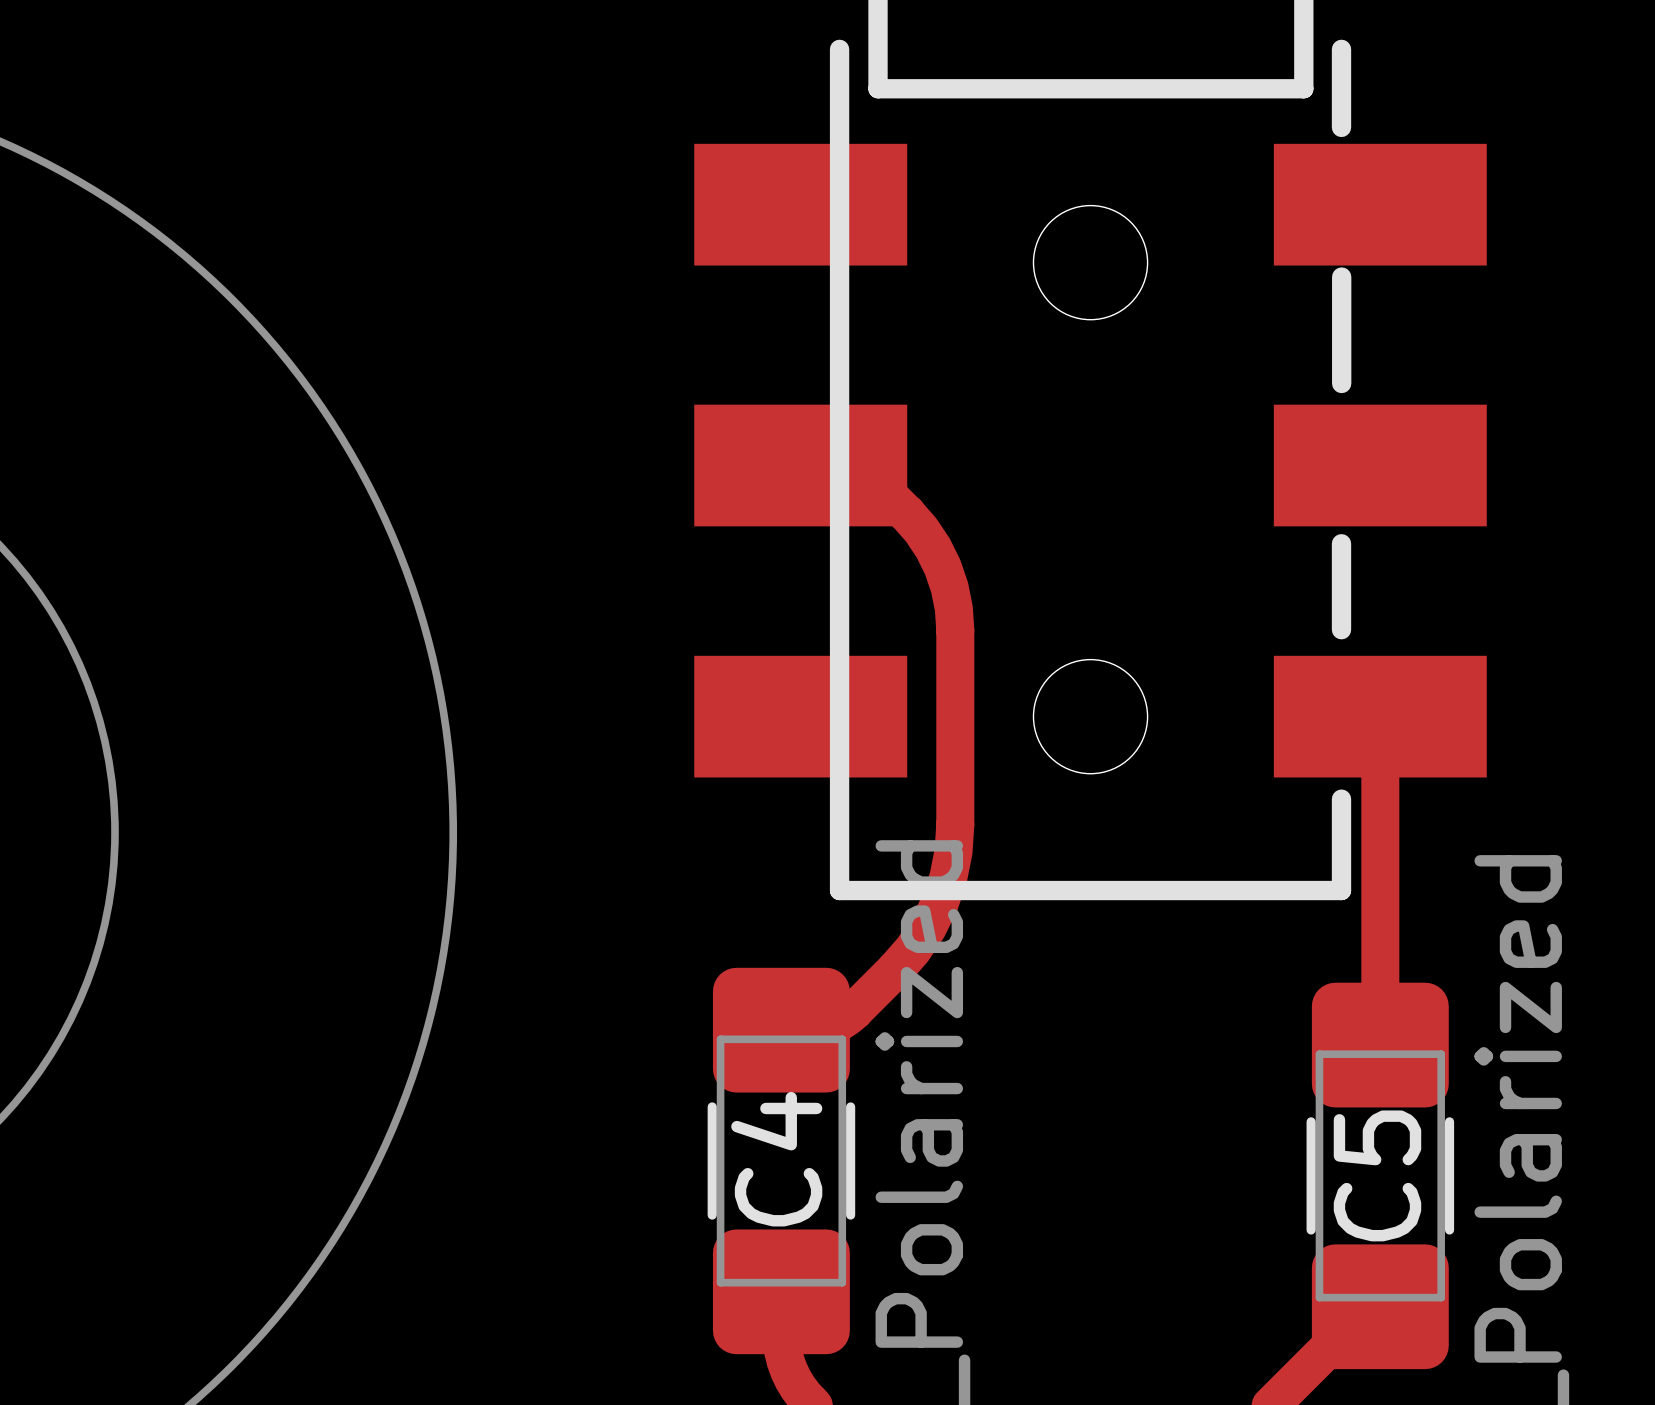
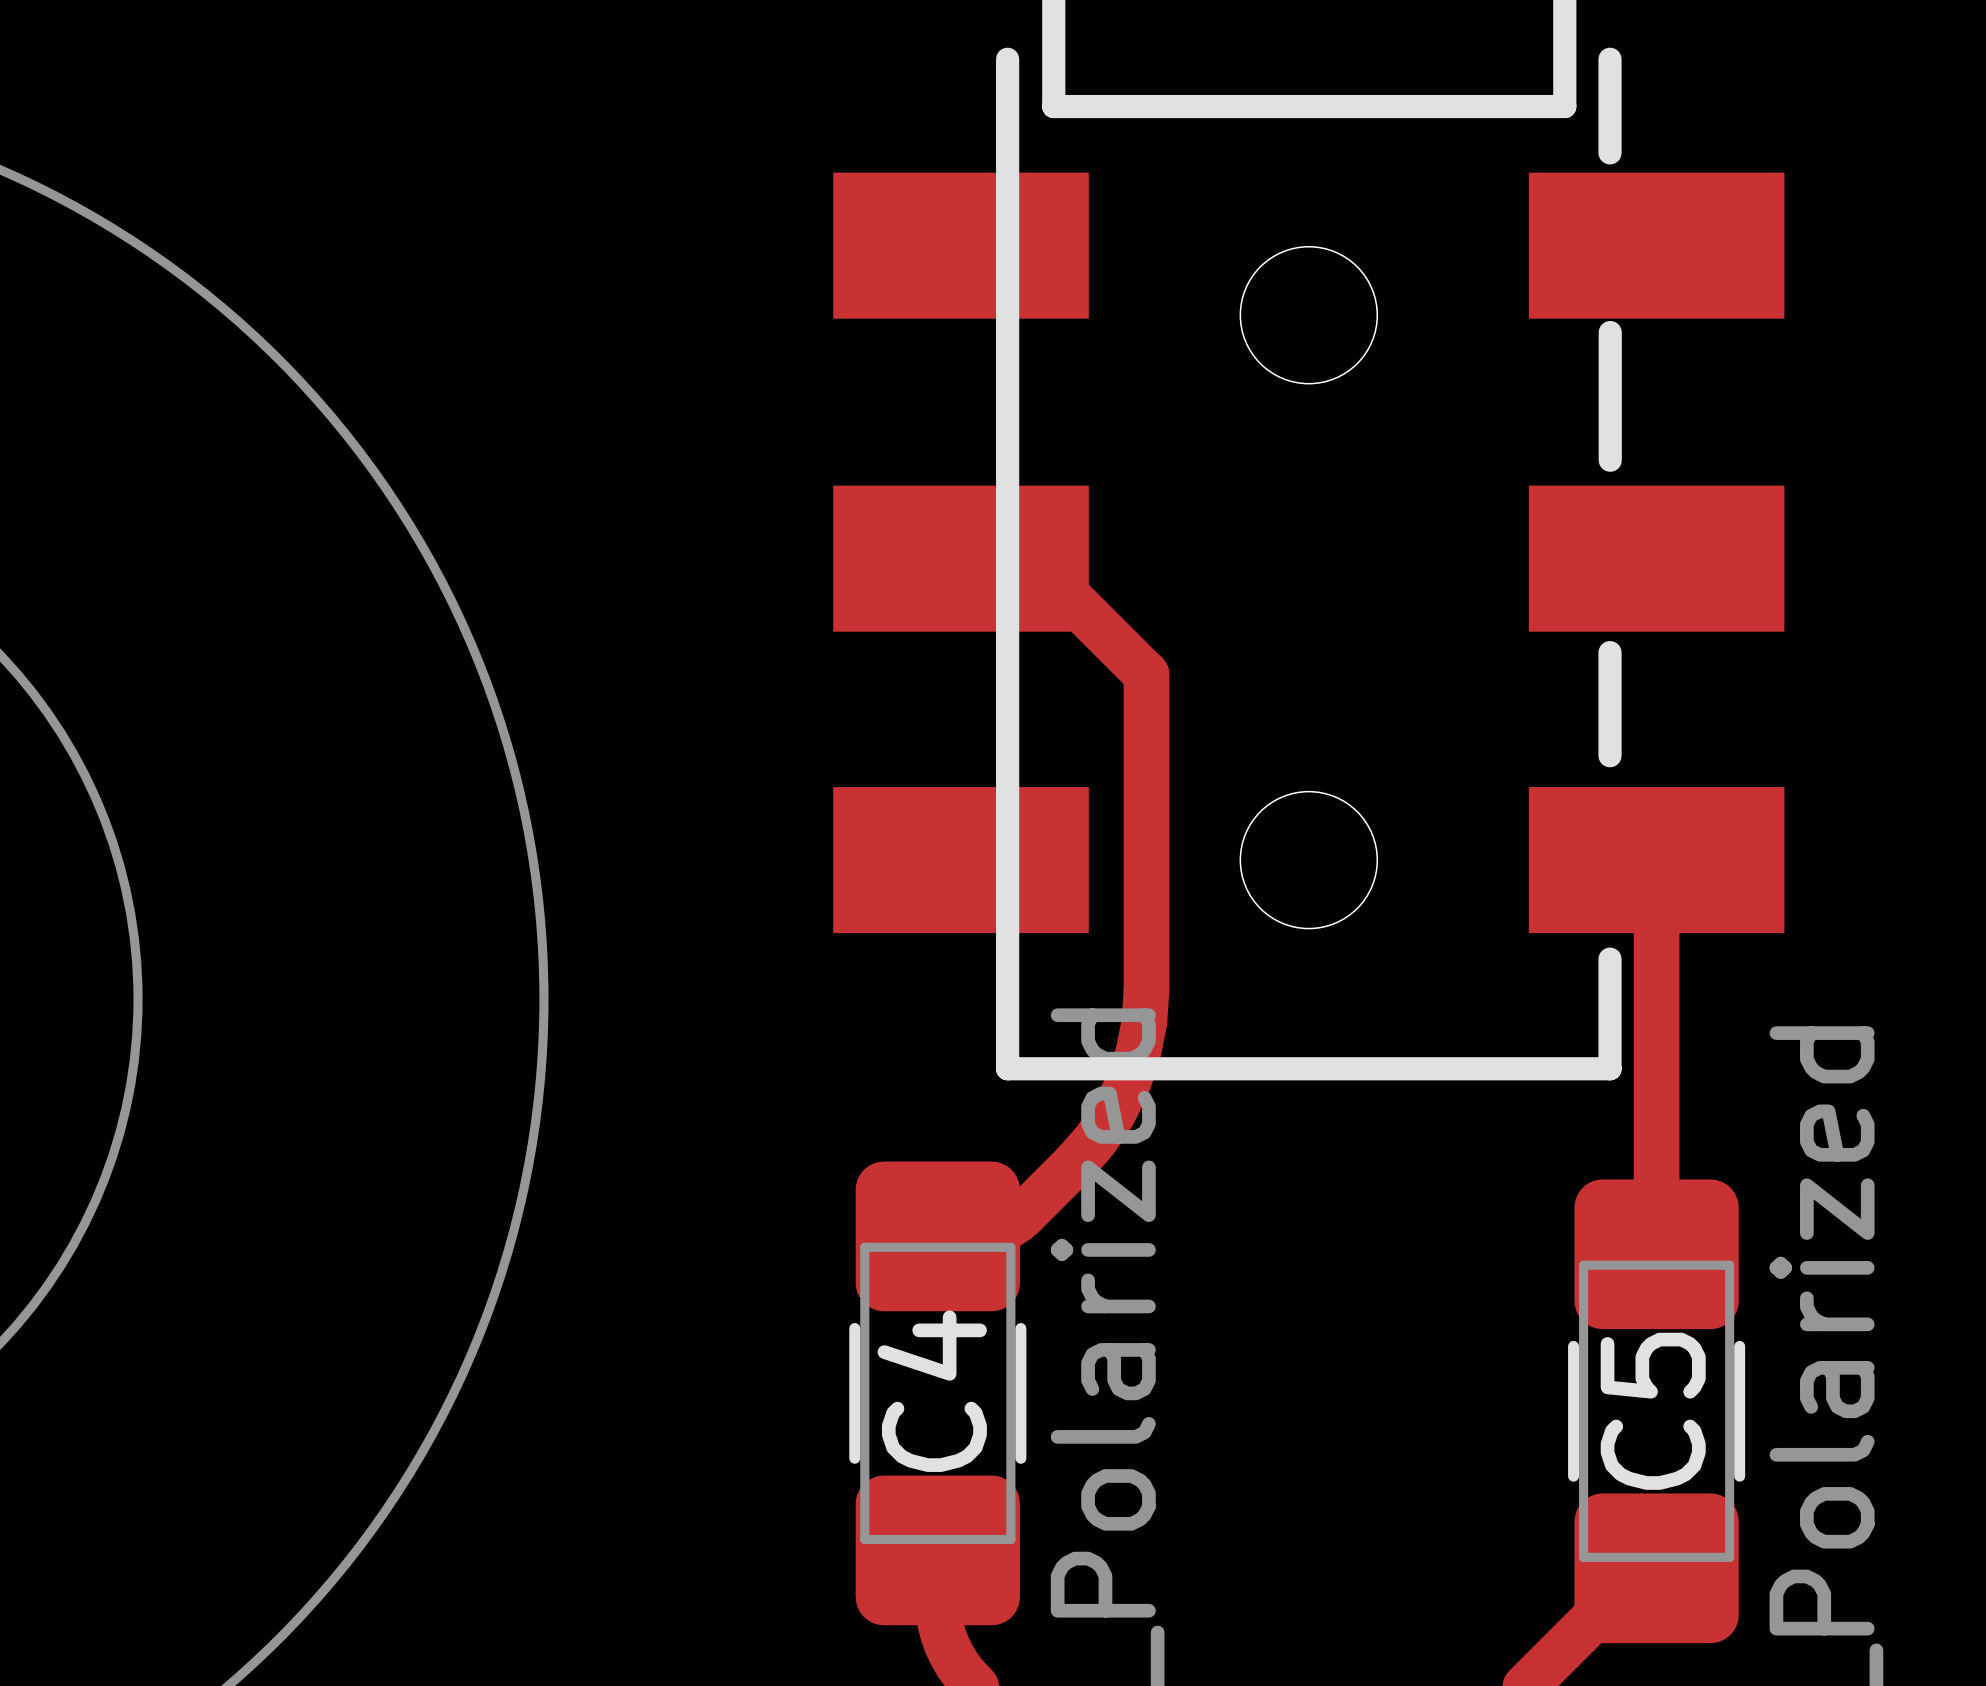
top track: (906, 513) (921, 530) (942, 567) (953, 608) (955, 630) -> (1088, 616) (1146, 674) (1146, 756)

